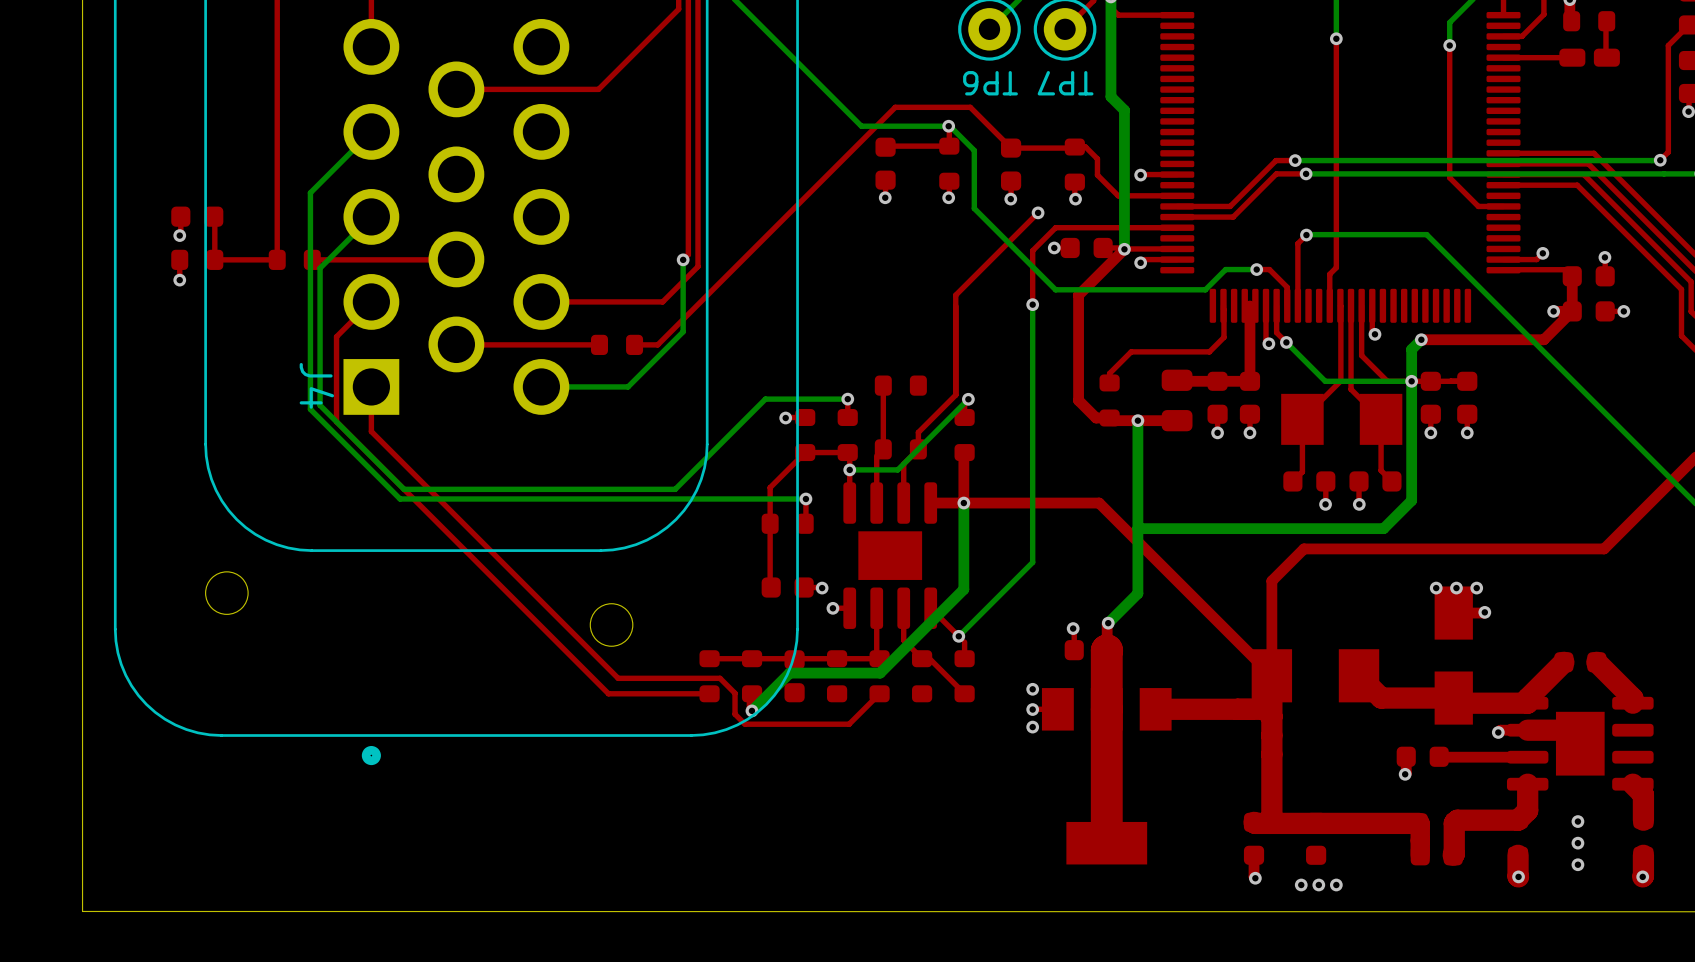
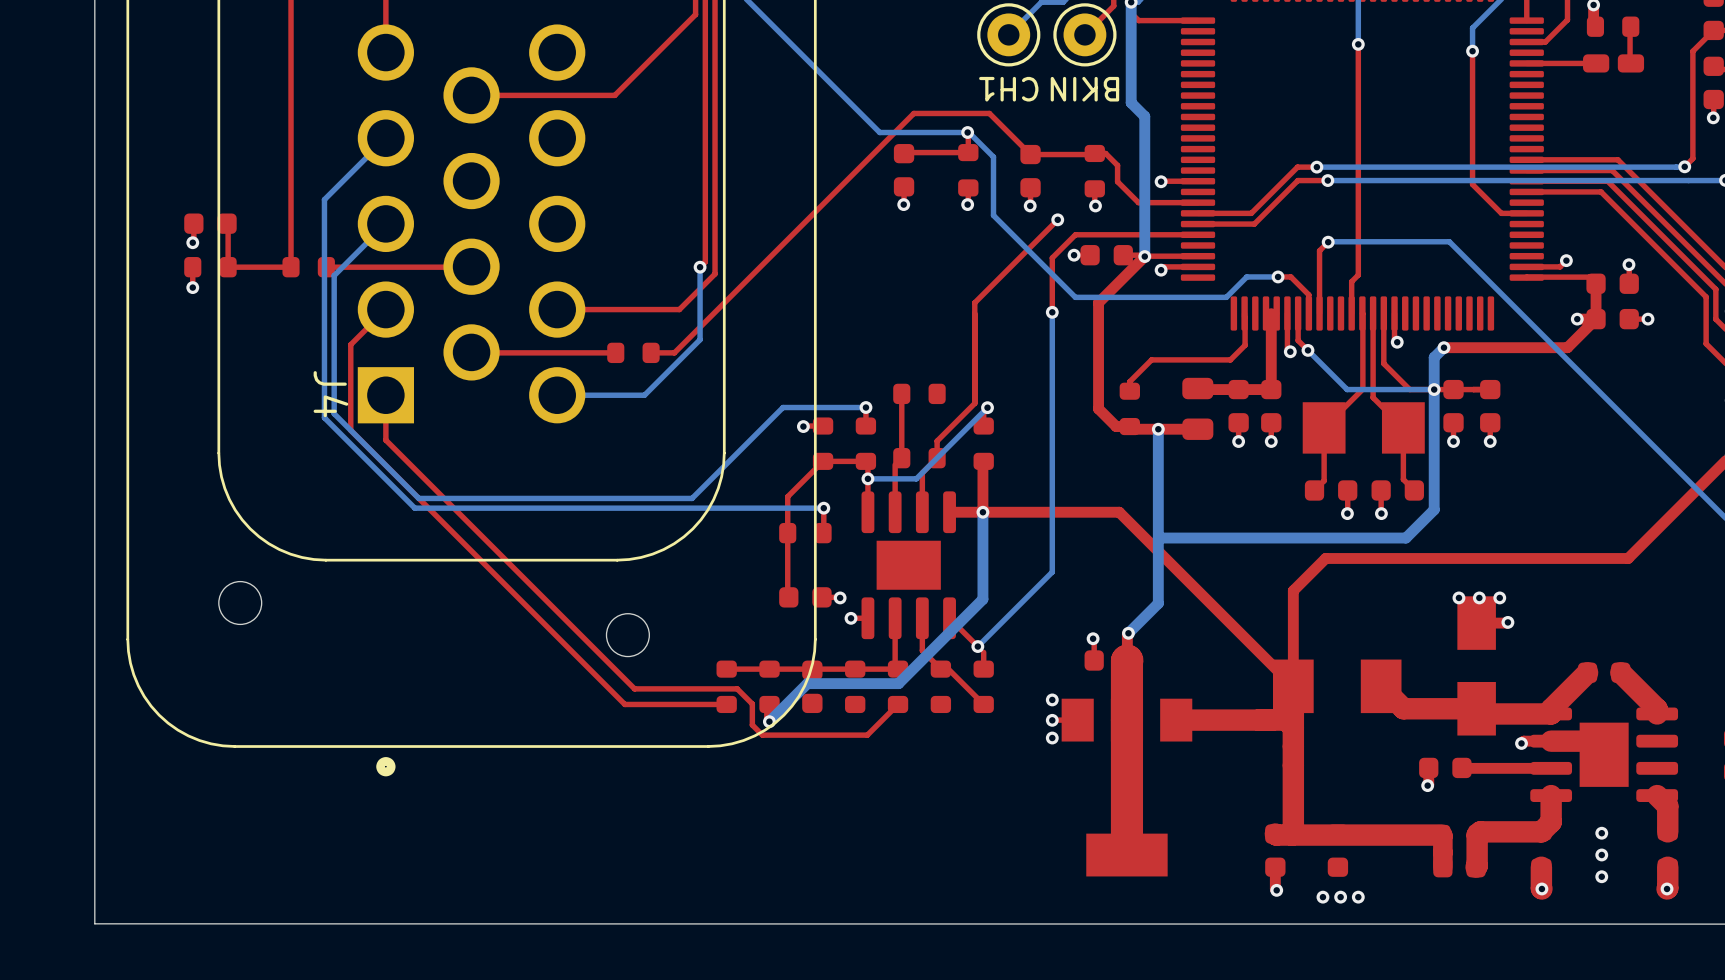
TP6 name: TP6 (990, 83) -> CH1 (1008, 89)
TP7 name: TP7 (1065, 83) -> BKIN (1084, 89)

